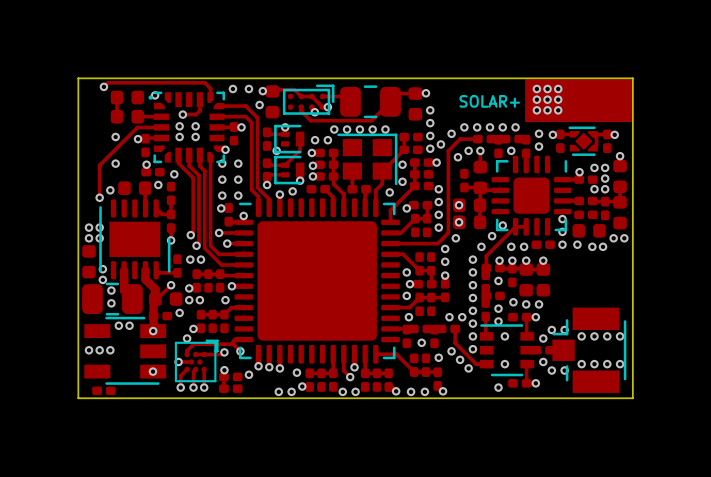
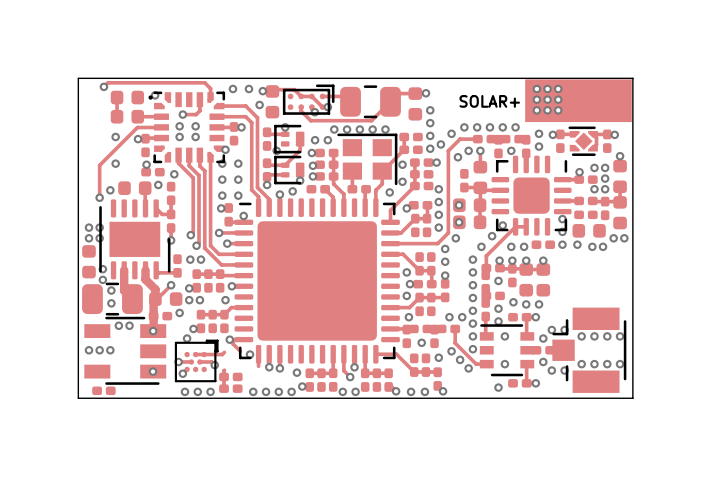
via: none -> (229, 339)
track: (233, 344) (193, 344) (187, 350) (187, 354) -> none
via: (240, 351) -> none
via: (224, 352) -> none
via: none -> (250, 354)
track: none -> (199, 362) (211, 362) (214, 365)
via: none -> (214, 365)
via: (258, 366) -> none
track: (195, 369) (193, 371) (193, 387) -> none
track: (204, 369) (204, 387) -> none
via: (224, 370) -> none
track: (182, 373) (180, 375) (180, 387) -> none
via: none -> (182, 373)
via: (248, 374) -> none
via: (180, 387) -> none
via: (193, 387) -> none
via: (204, 387) -> none
via: none -> (184, 391)
via: none -> (197, 391)
via: none -> (210, 391)
via: none -> (253, 391)
via: none -> (266, 391)

